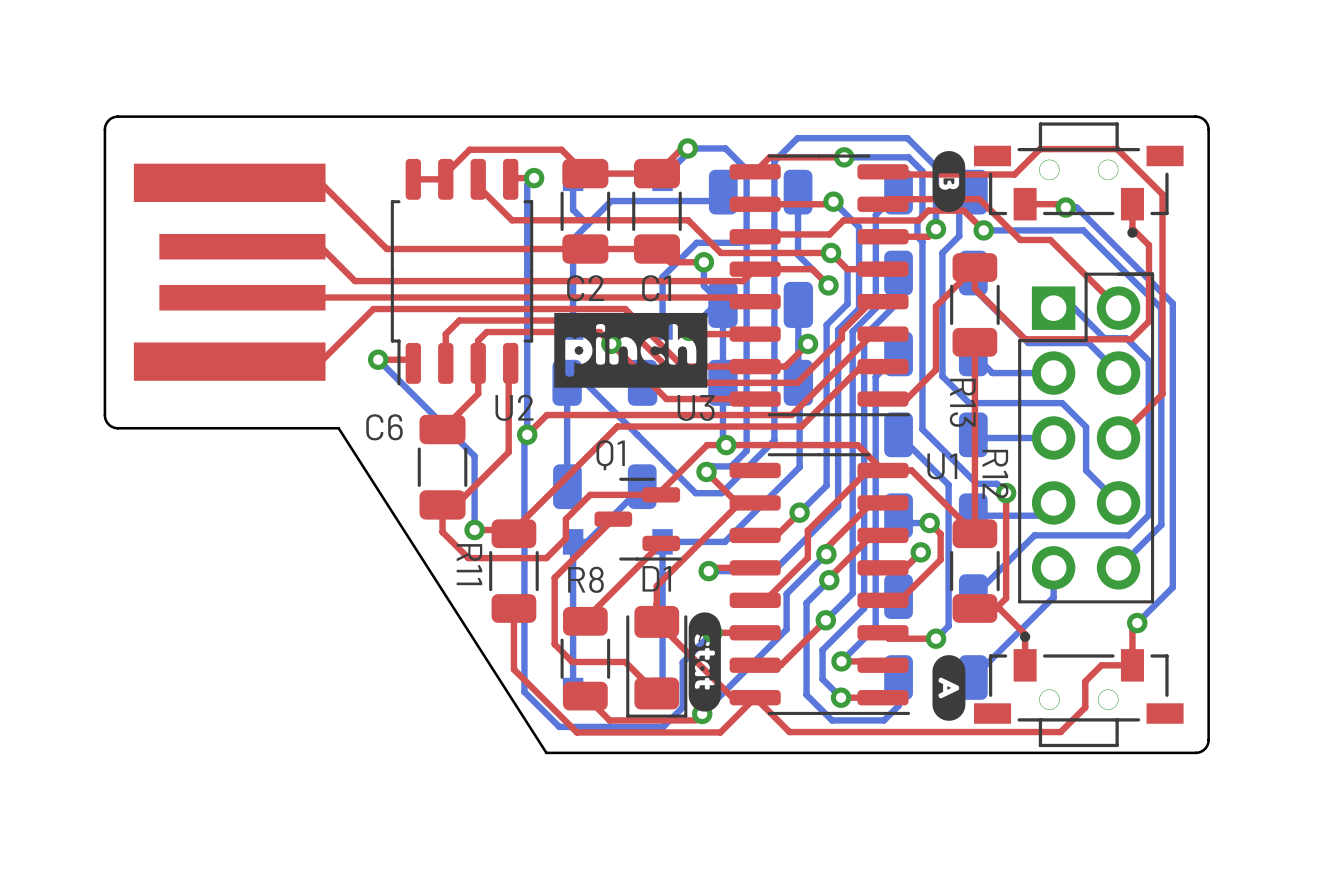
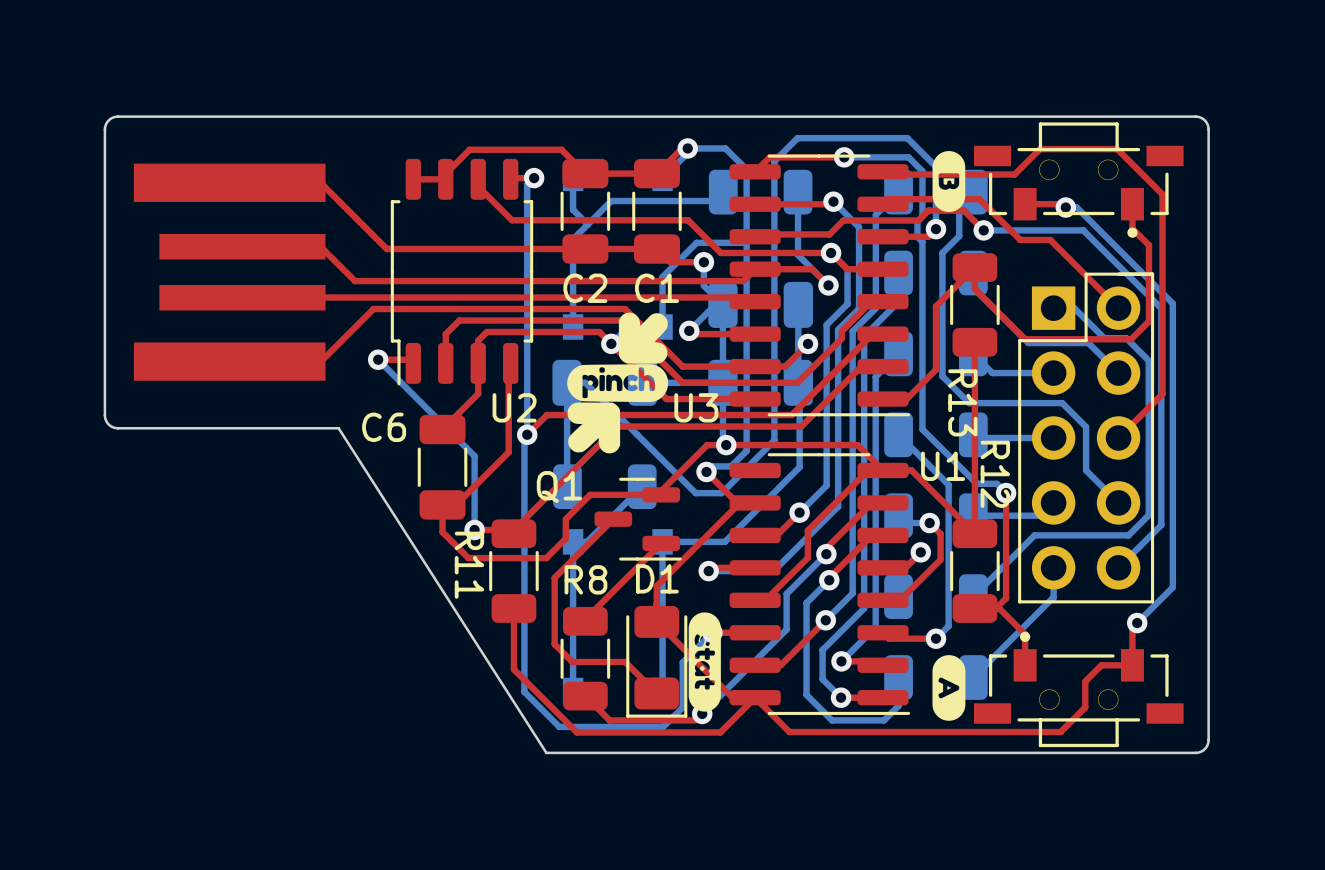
drawing: [554, 312, 708, 388] -> none
drawing: none -> [567, 312, 669, 454]
Q1 name position: Q1 (610, 455) -> Q1 (559, 486)

